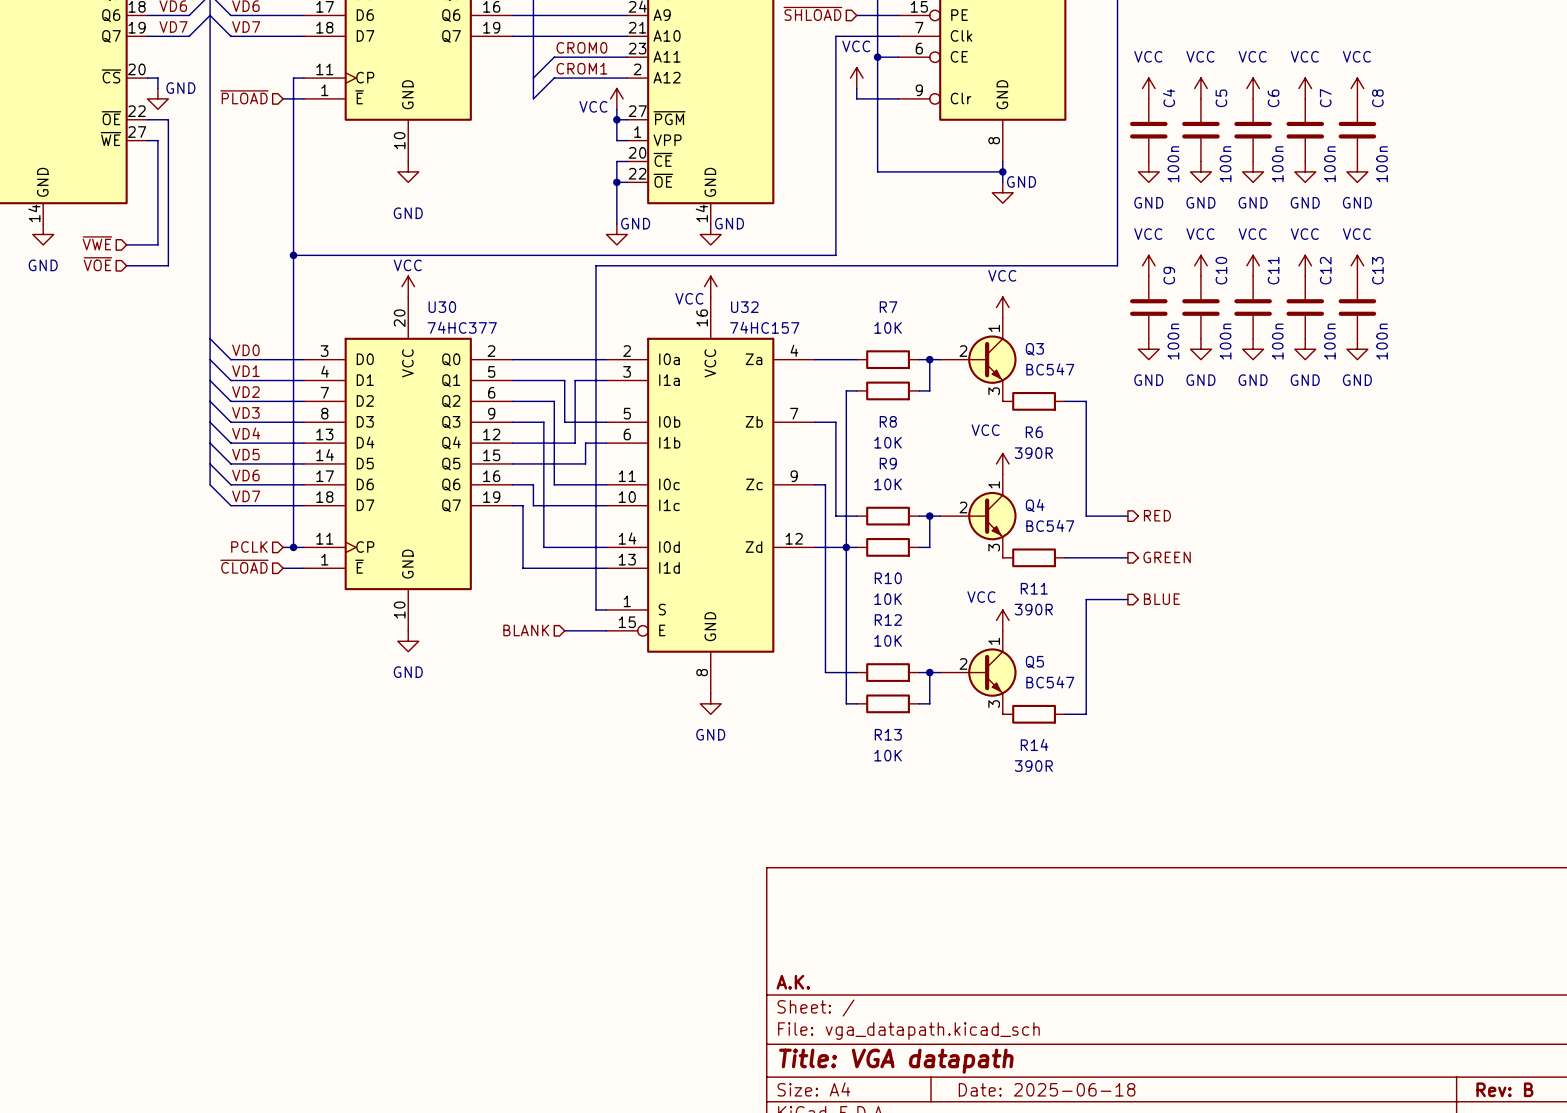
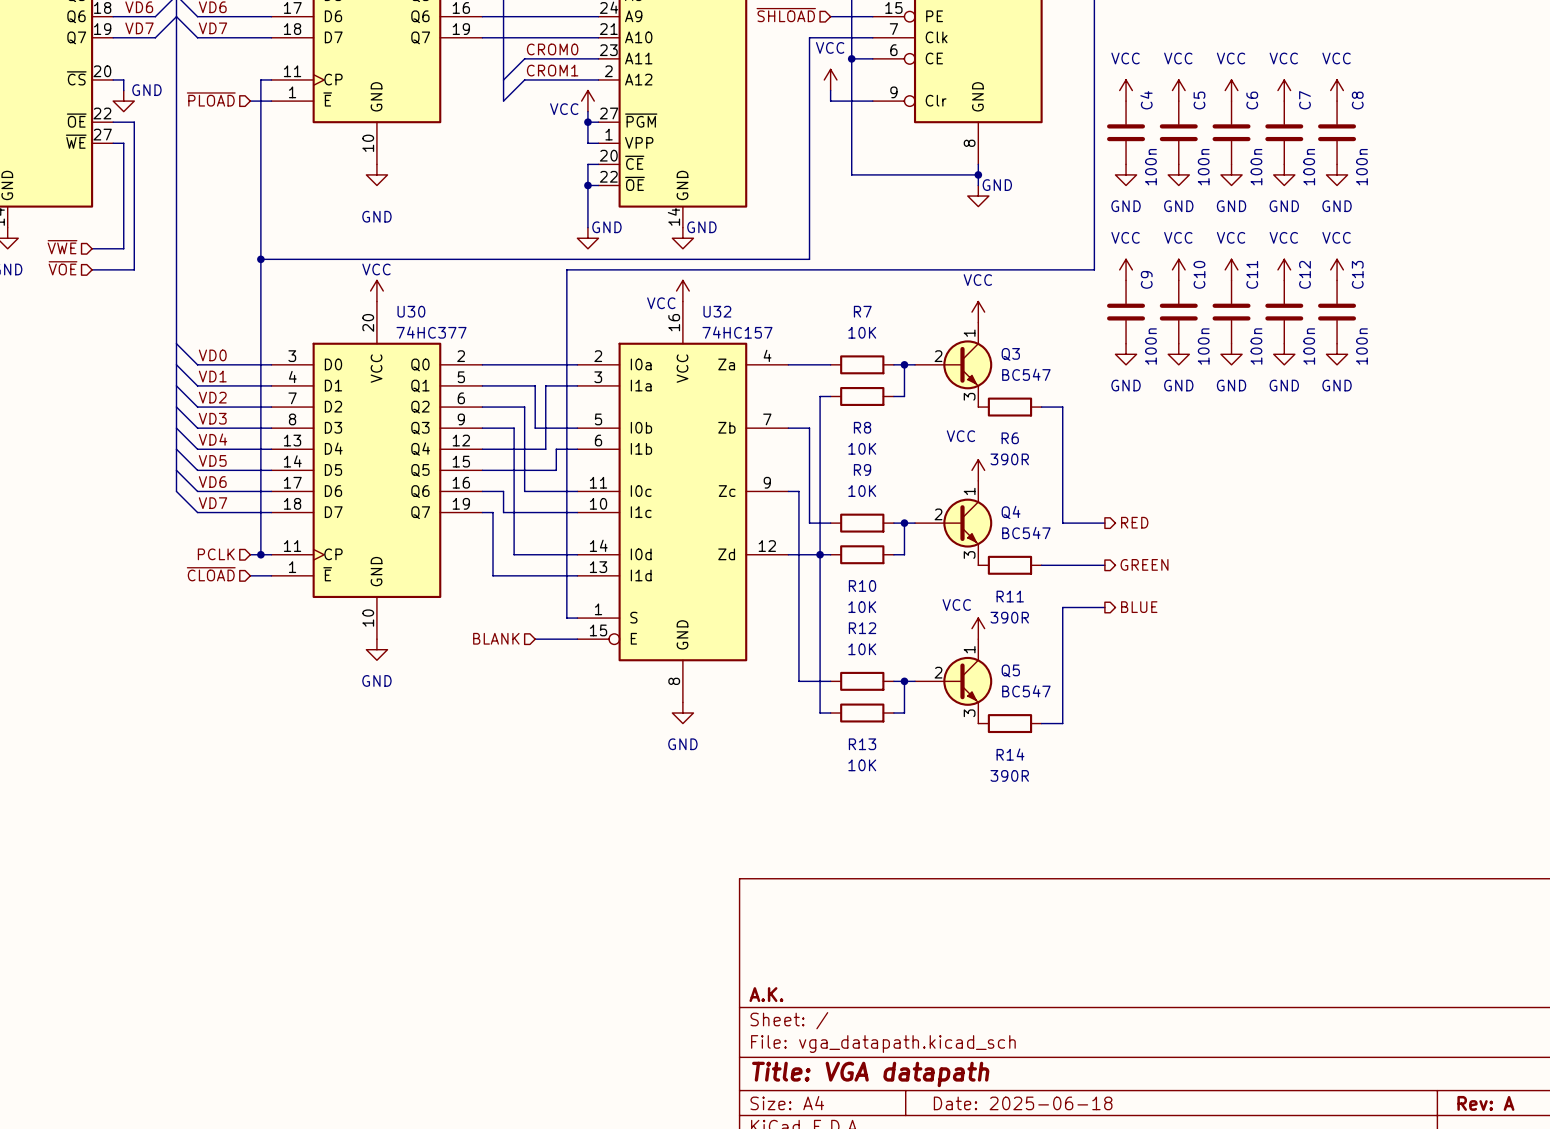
title block: Rev: B (1504, 1089) -> Rev: A (1485, 1103)

